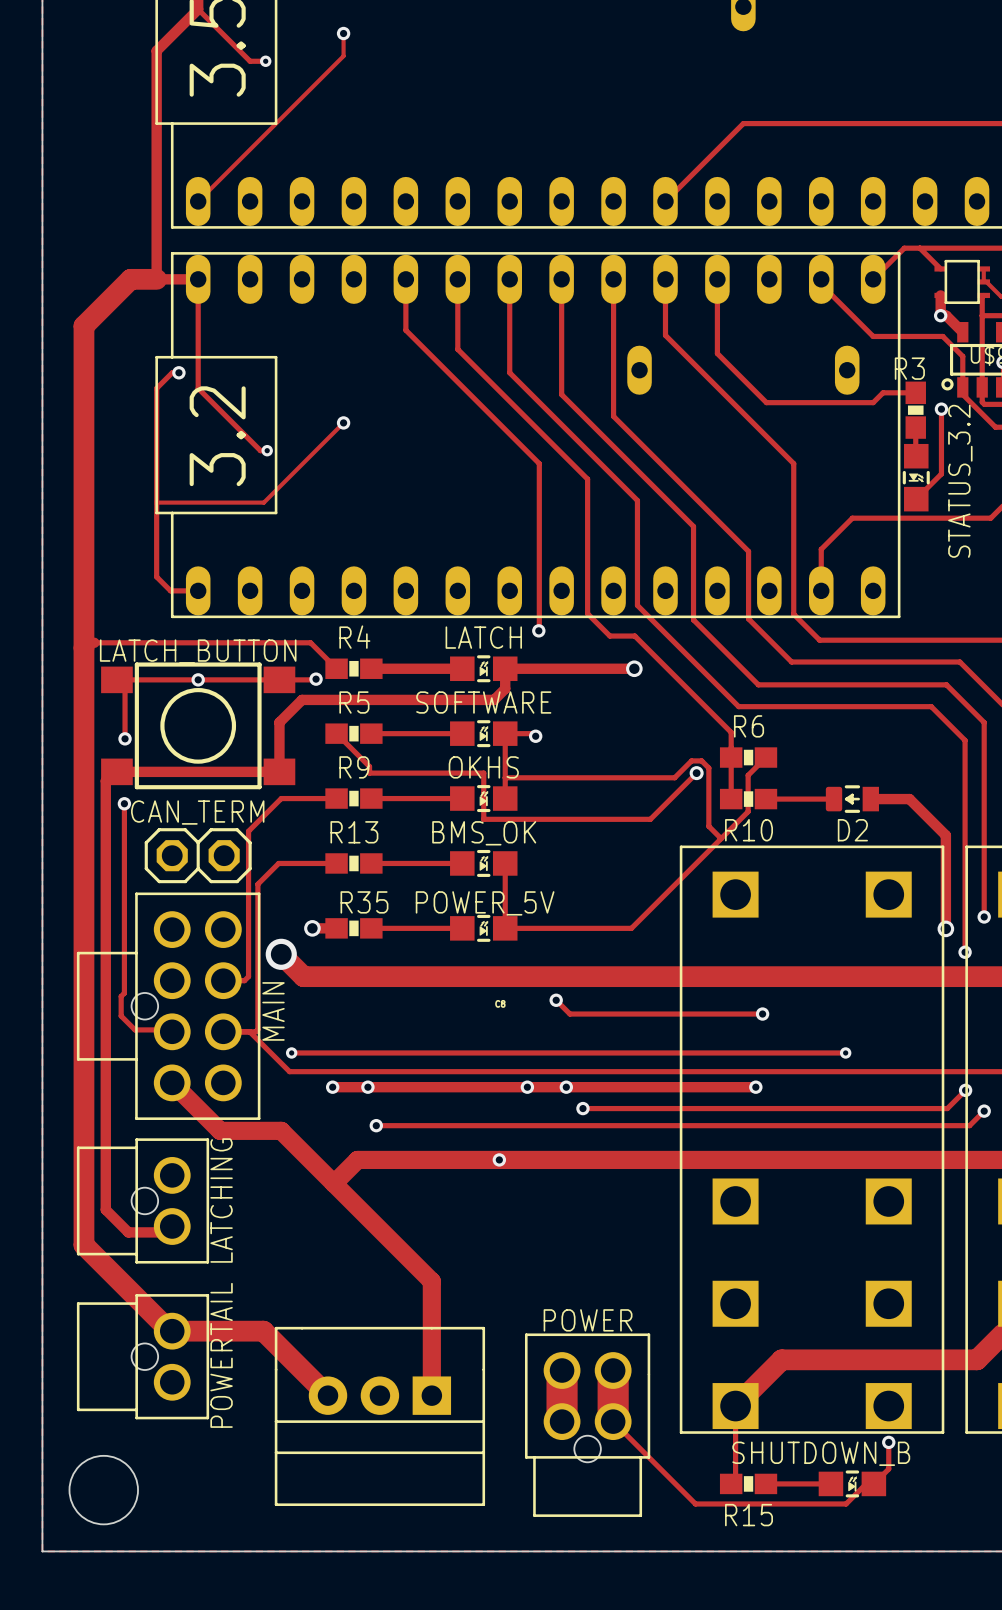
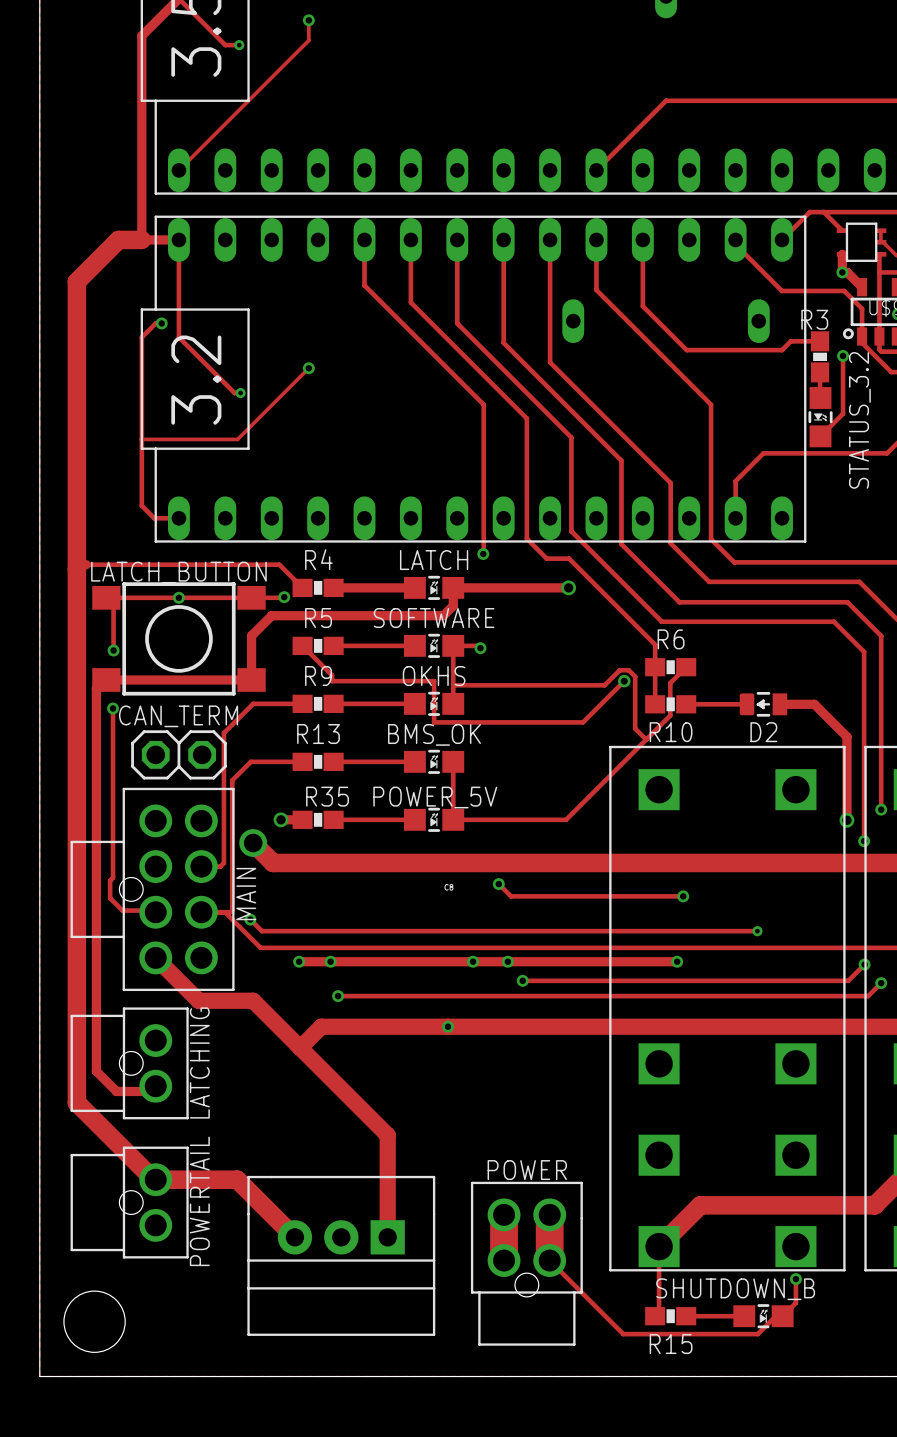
track: none -> (250, 919) (262, 931)
via: none -> (250, 919)
via: (291, 1052) -> none

